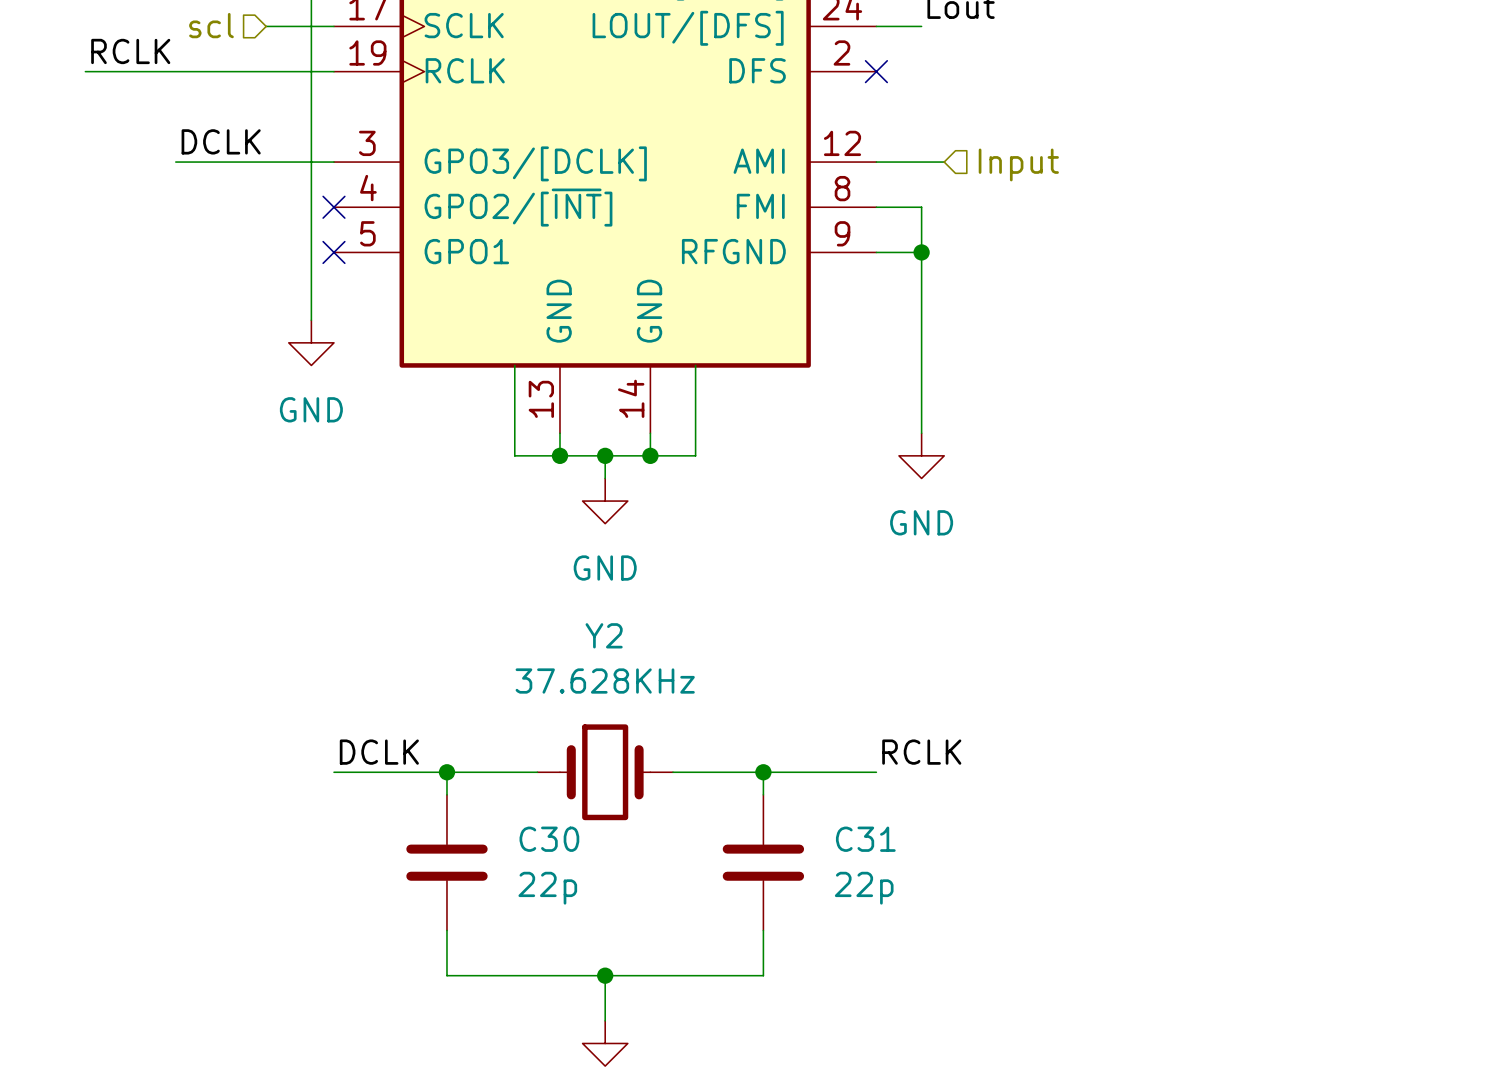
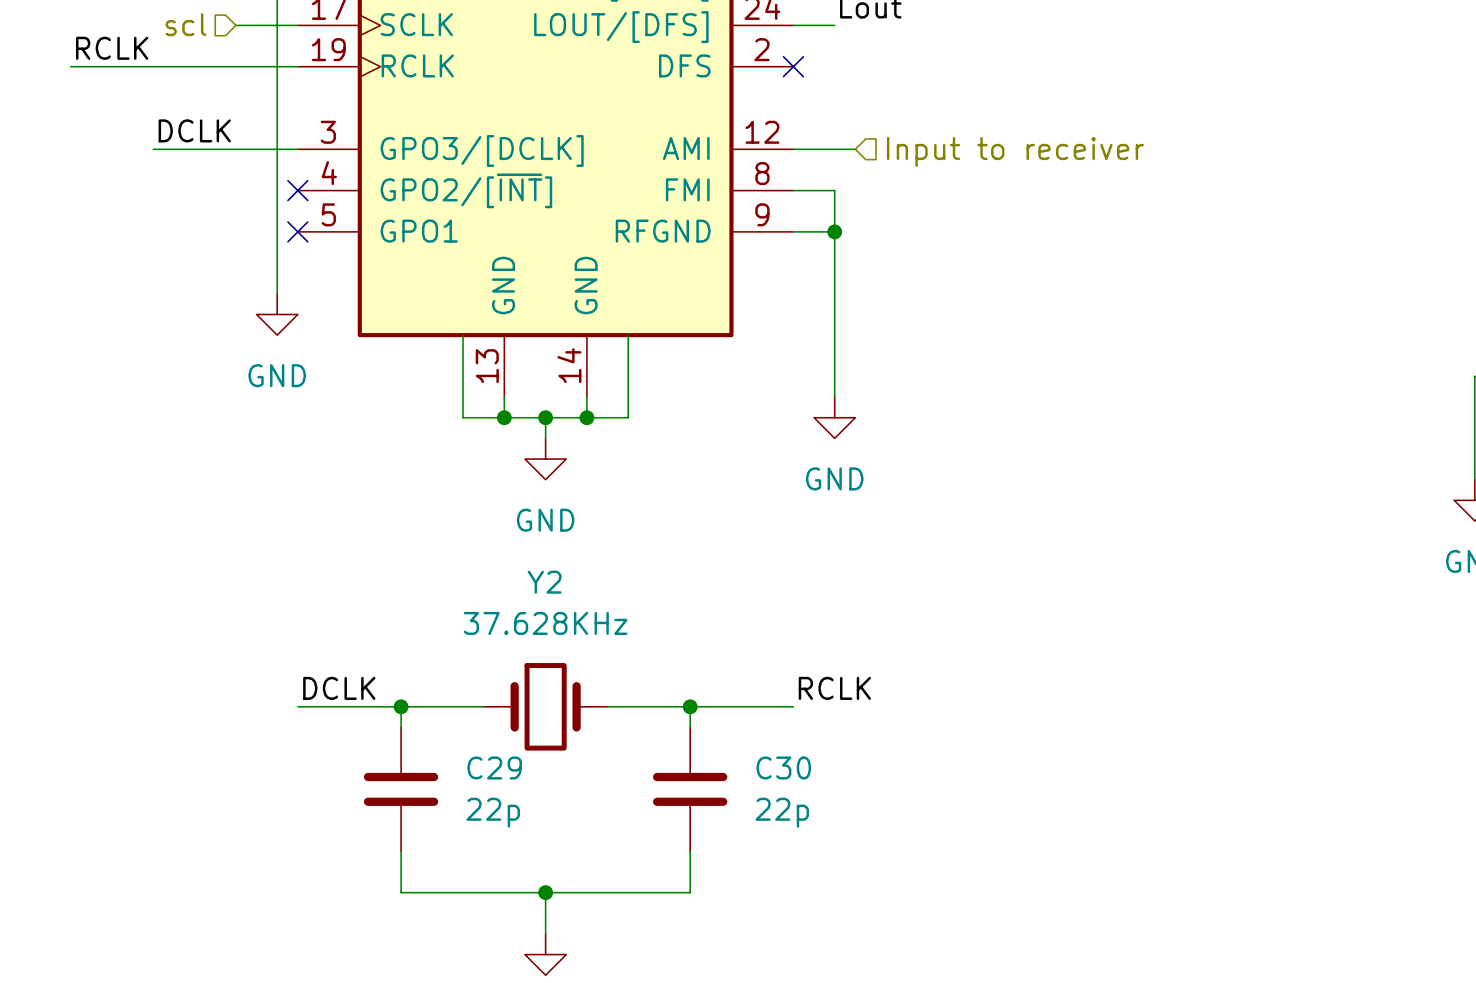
hierarchical label: Input (1018, 164) -> Input to receiver (1015, 151)
C30 name: C30 (549, 839) -> C29 (494, 767)
C31 name: C31 (865, 839) -> C30 (783, 767)

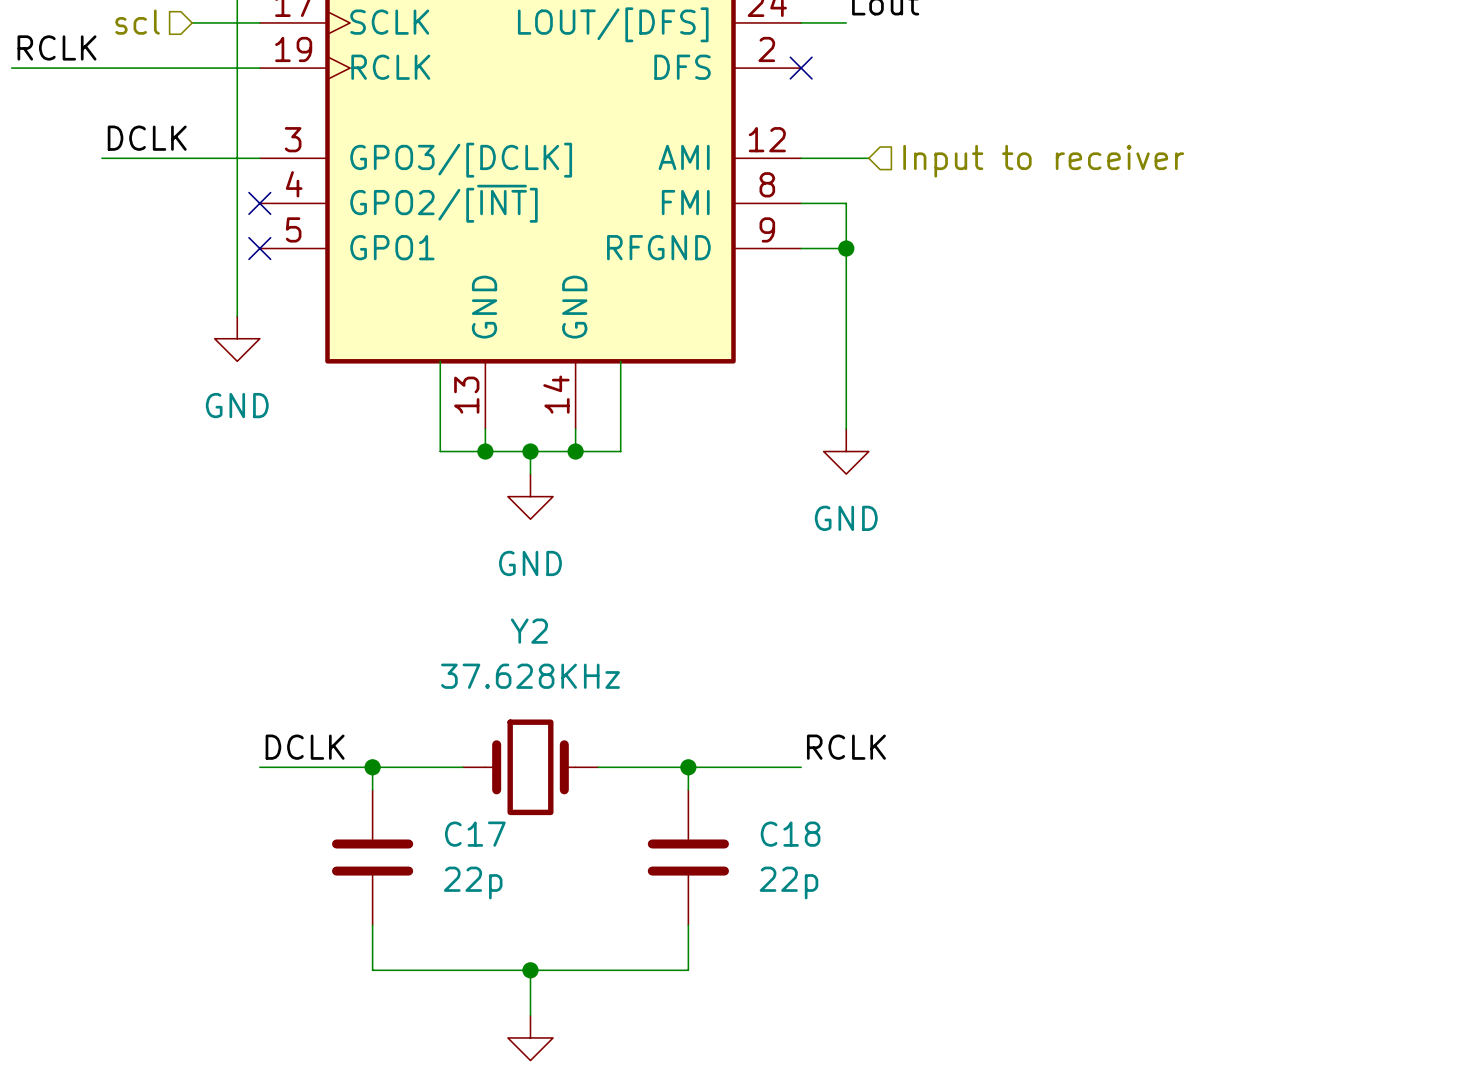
C29 name: C29 (494, 767) -> C17 (475, 834)
C30 name: C30 (783, 767) -> C18 (790, 834)

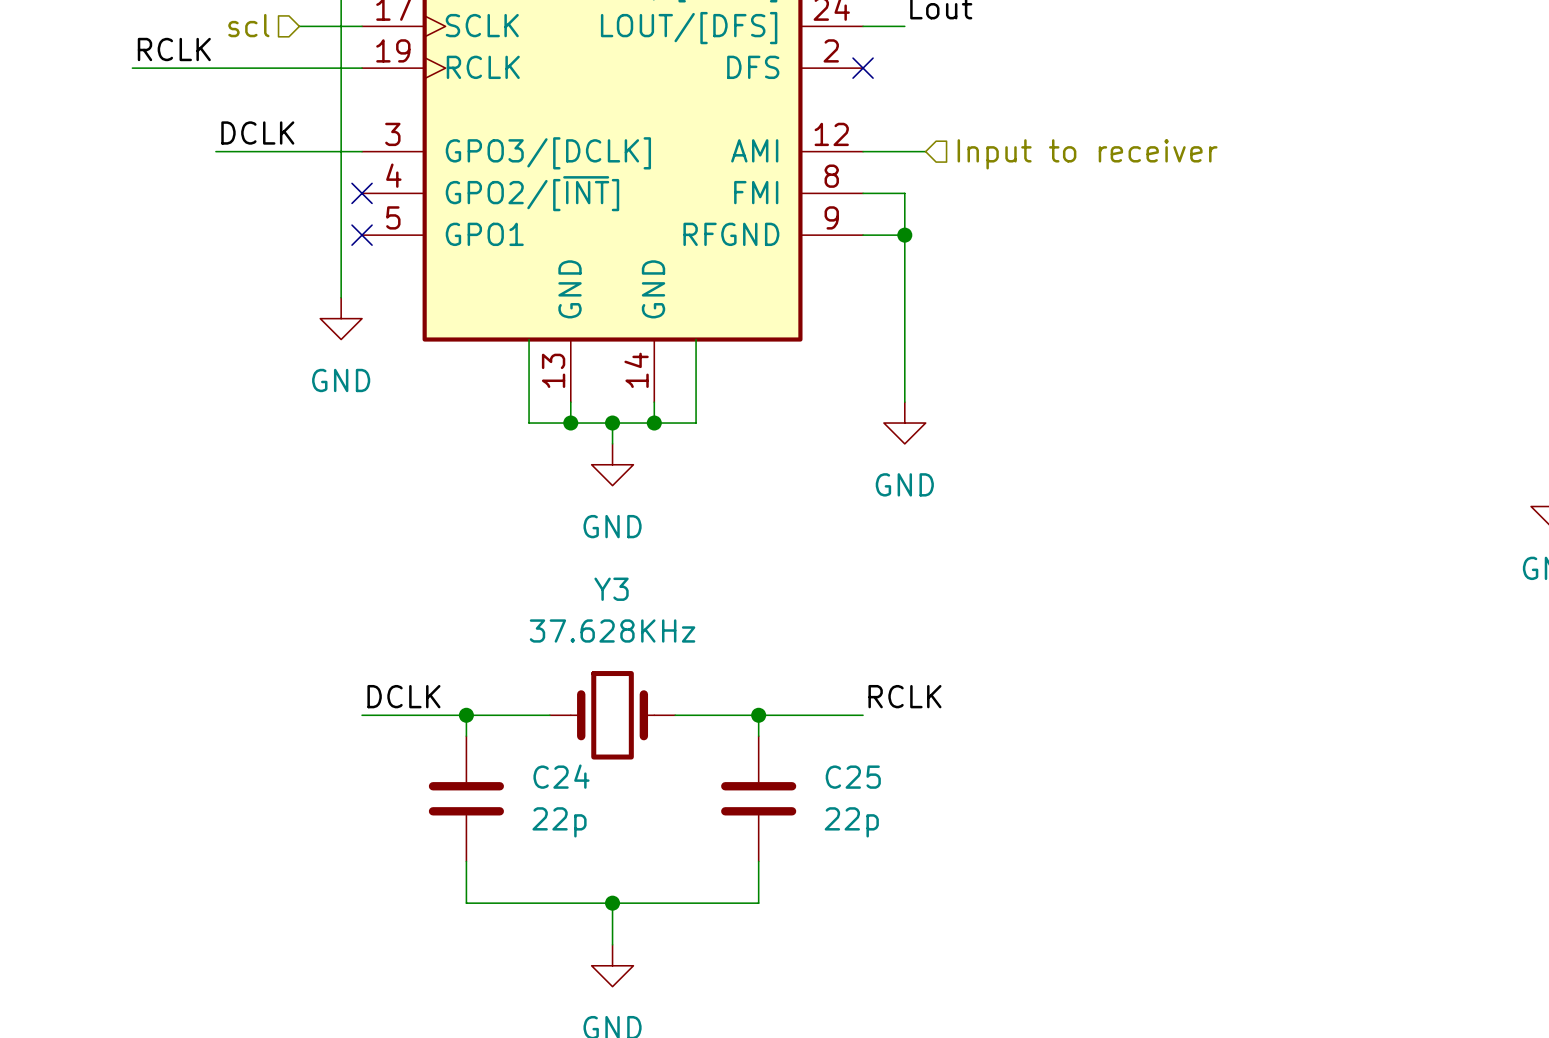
Y2 name: Y2 (529, 631) -> Y3 (611, 589)
C17 name: C17 (475, 834) -> C24 (561, 776)
C18 name: C18 (790, 834) -> C25 (853, 777)

